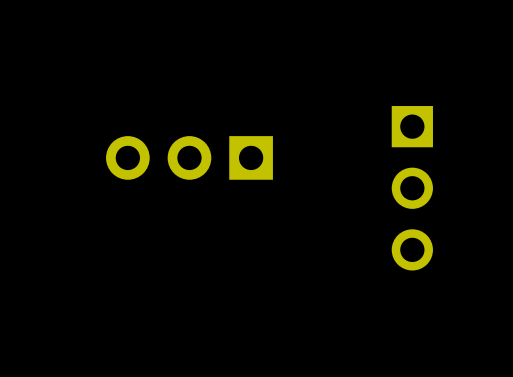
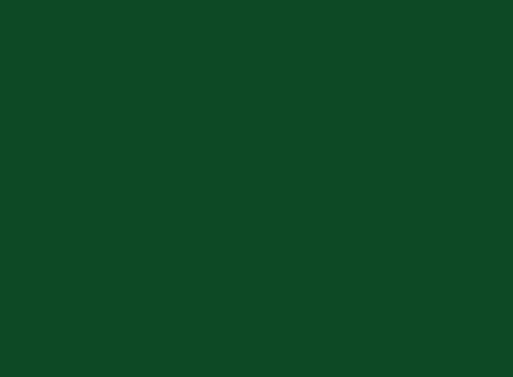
part: (189, 157) -> none
part: (412, 188) -> none

